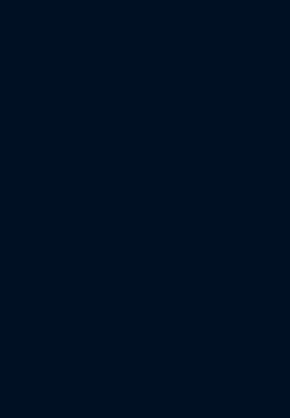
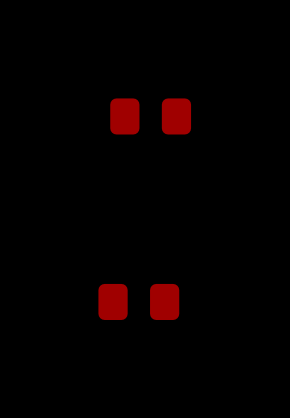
part: none -> (150, 116)
part: none -> (138, 301)

